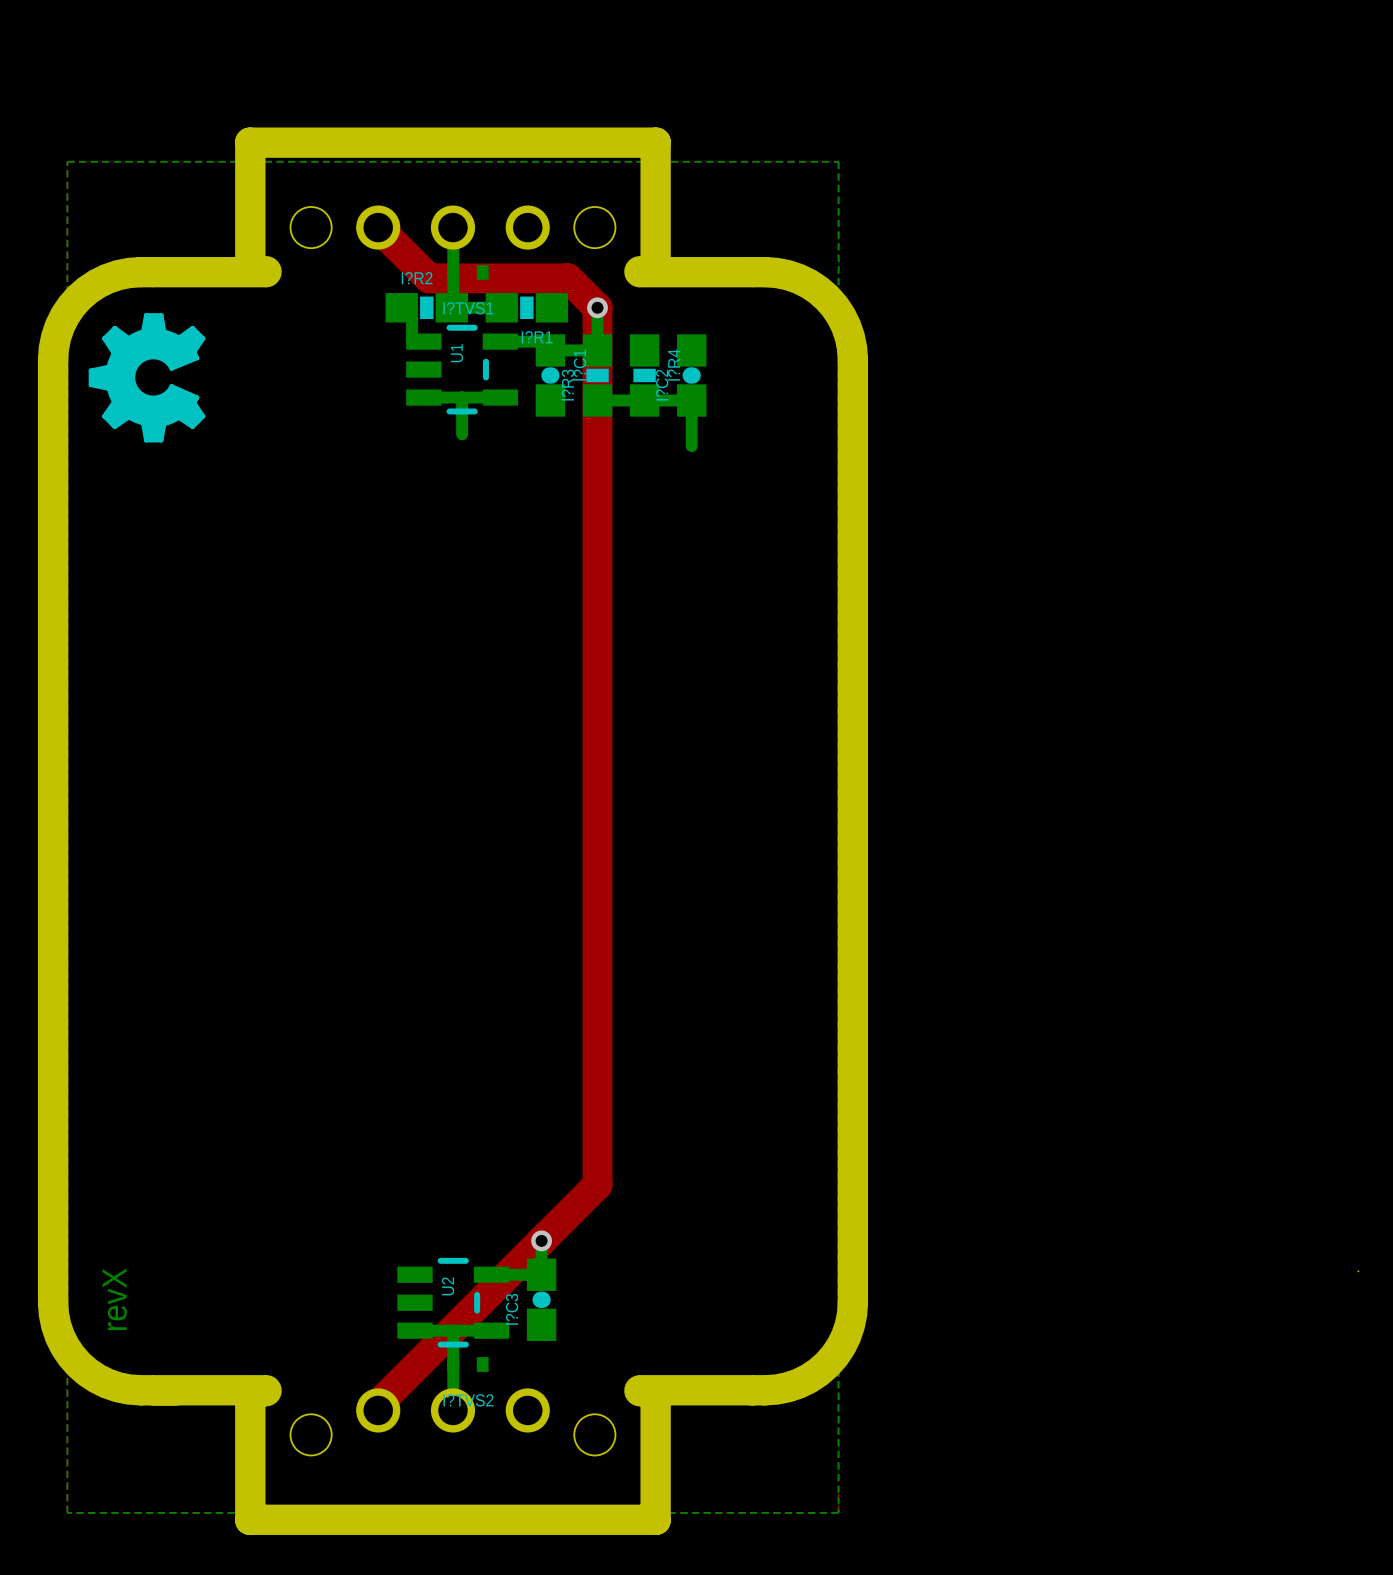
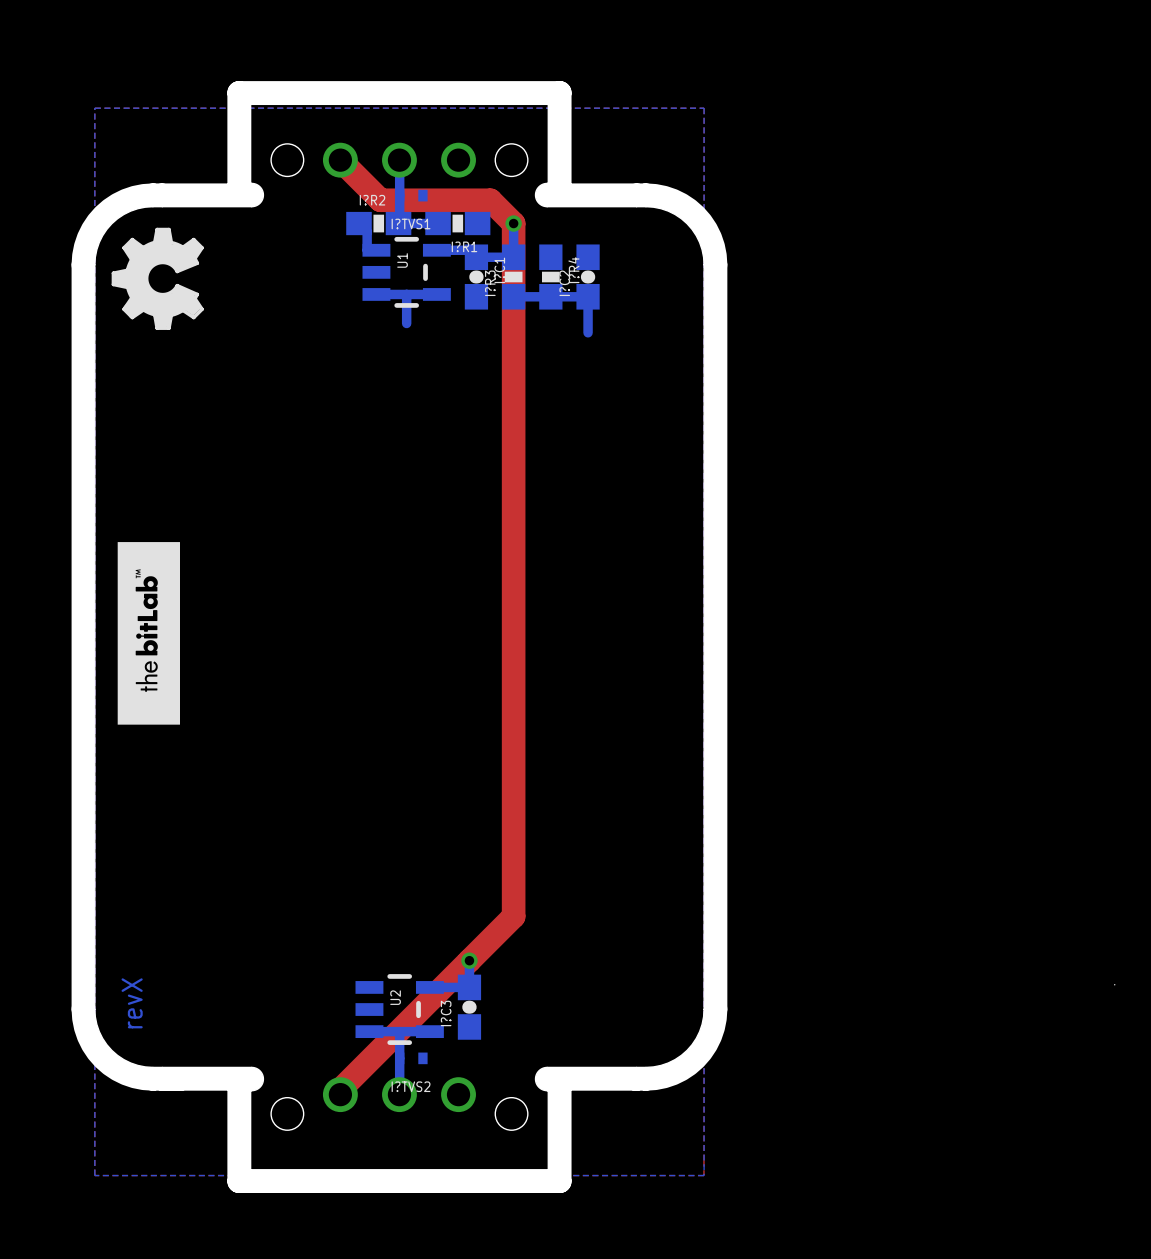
drawing: none -> [117, 542, 180, 725]

